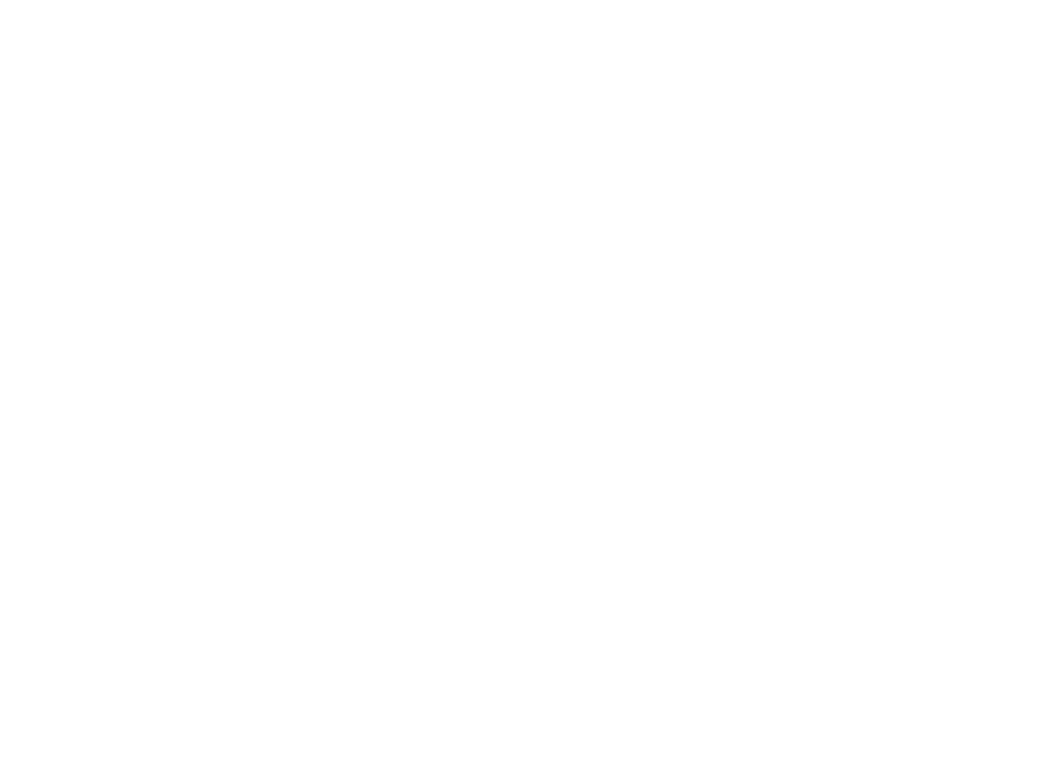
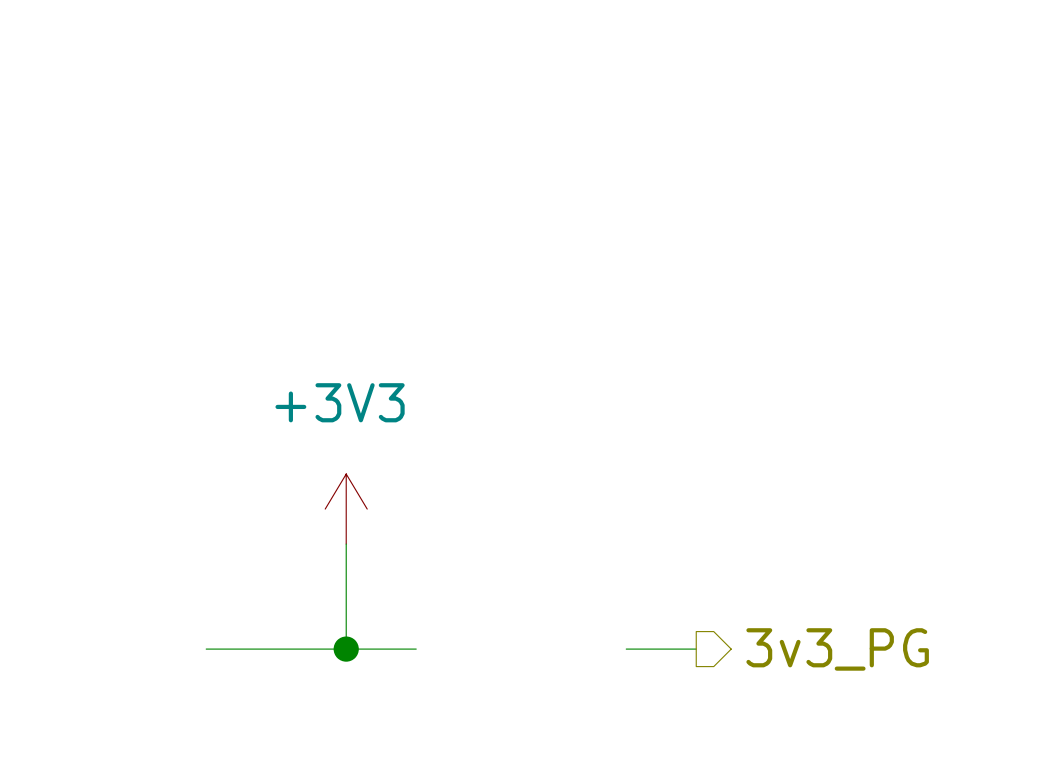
power symbol: none -> +3V3 (346, 509)
wire: none -> (346, 544) (346, 649)
wire: none -> (206, 649) (416, 649)
junction: none -> (346, 649)
wire: none -> (626, 649) (696, 649)
hierarchical label: none -> 3v3_PG (837, 649)

